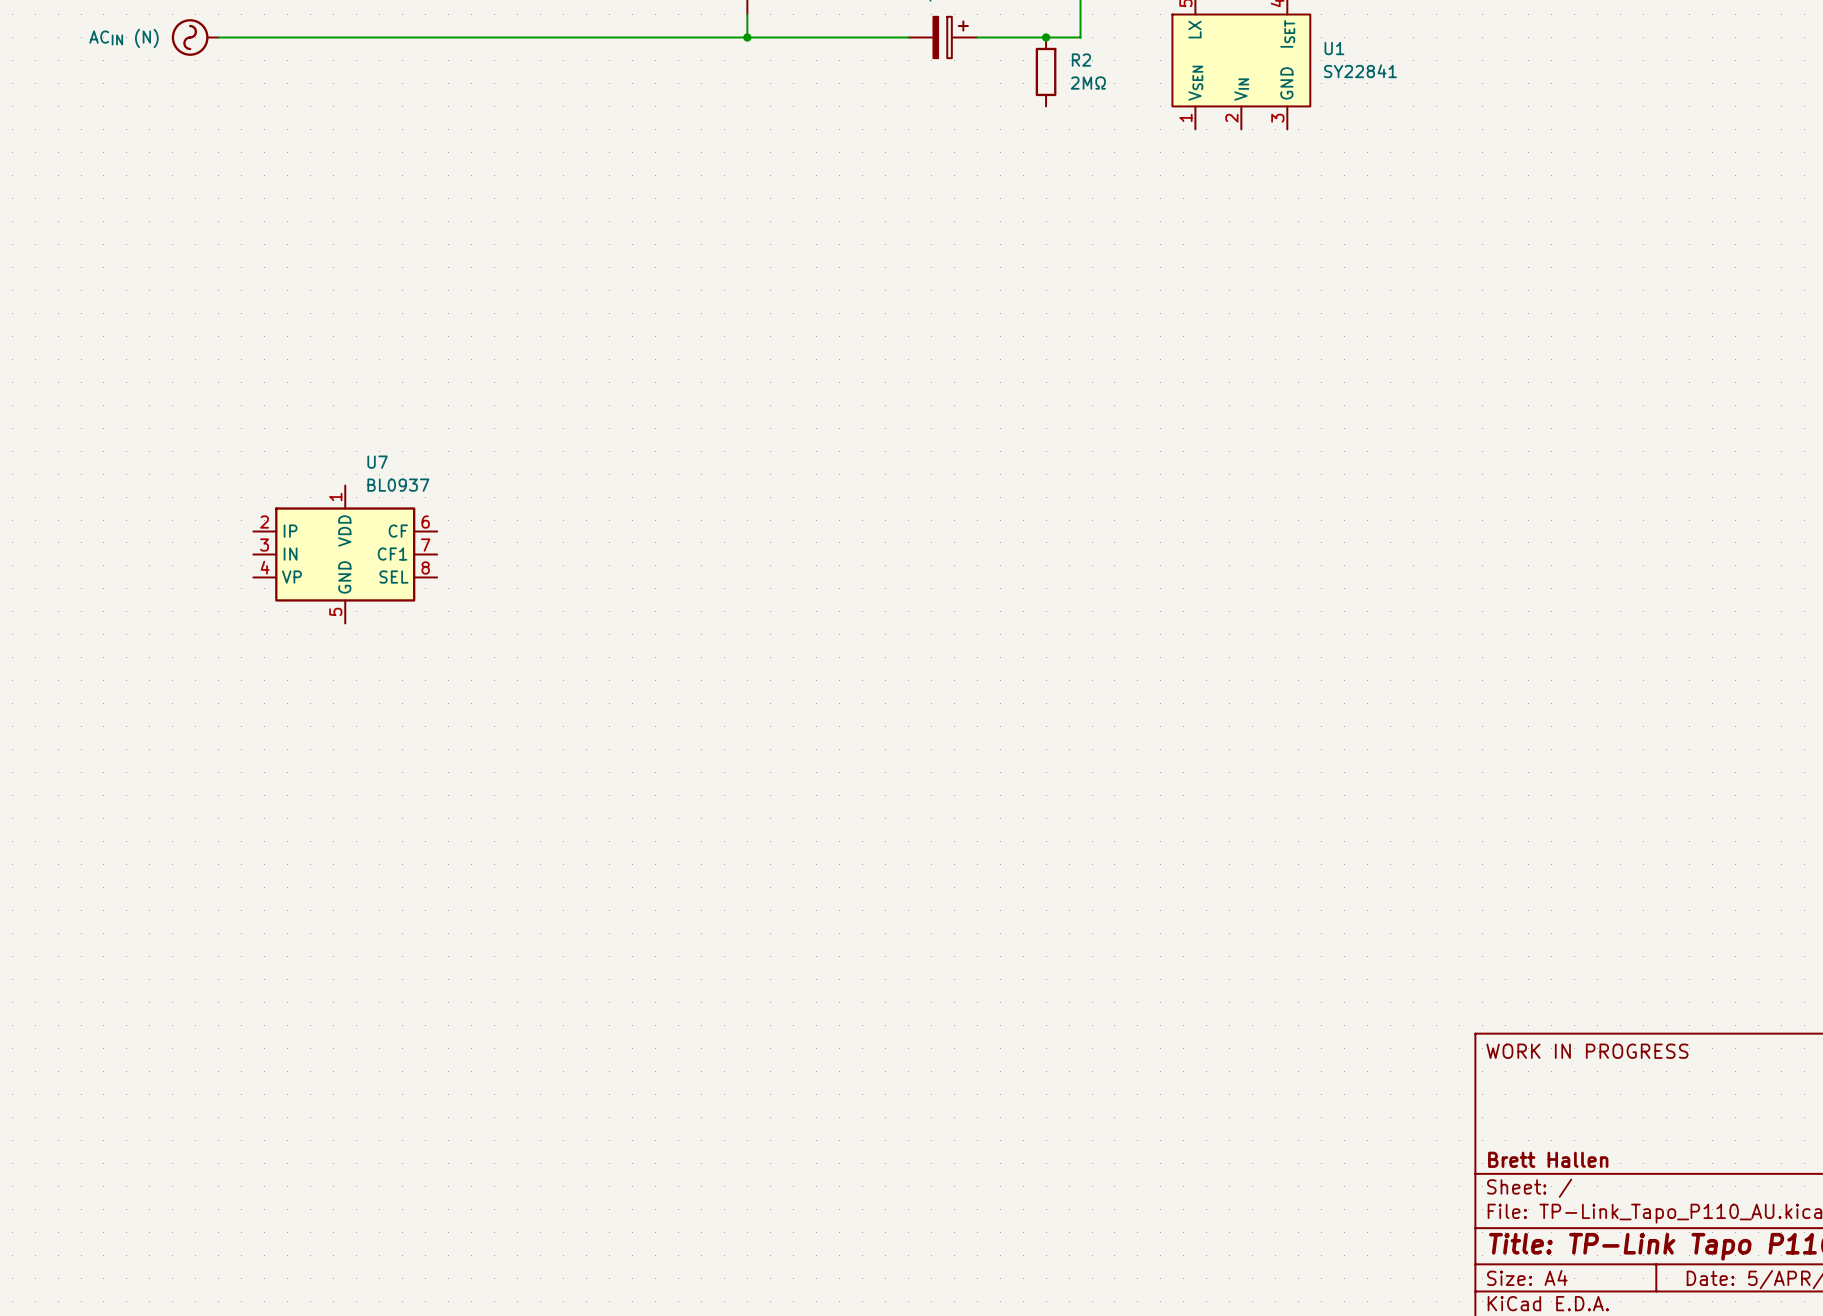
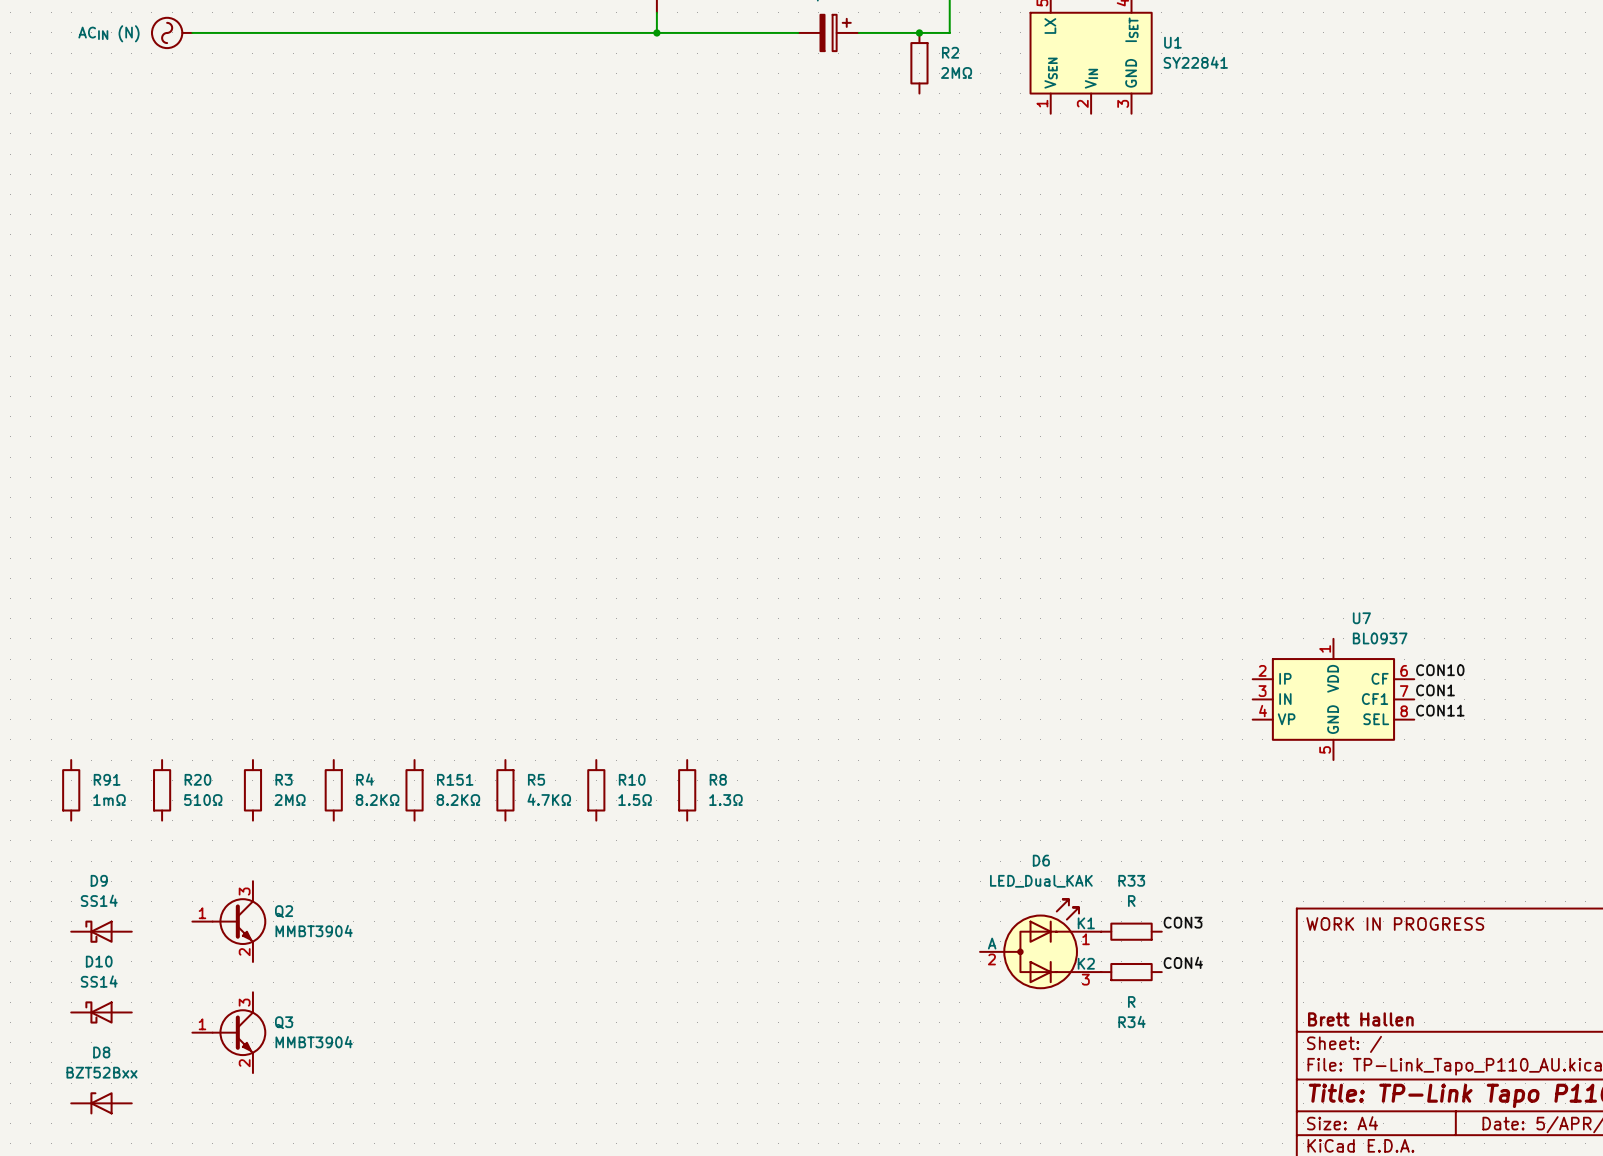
U7 position: (345, 554) -> (1333, 699)
label: none -> CON10 (1440, 670)
label: none -> CON1 (1435, 690)
label: none -> CON11 (1440, 710)
R91: none -> 1mΩ (71, 790)
R20: none -> 510Ω (162, 790)
R3: none -> 2MΩ (252, 790)
R4: none -> 8.2KΩ (333, 790)
R151: none -> 8.2KΩ (414, 790)
R5: none -> 4.7KΩ (505, 790)
R10: none -> 1.5Ω (596, 790)
R8: none -> 1.3Ω (687, 790)
Q2: none -> MMBT3904 (229, 921)
label: none -> CON3 (1183, 922)
D9: none -> SS14 (101, 931)
R33: none -> R (1131, 931)
D6: none -> LED_Dual_KAK (1040, 944)
label: none -> CON4 (1183, 962)
R34: none -> R (1131, 972)
D10: none -> SS14 (101, 1012)
Q3: none -> MMBT3904 (229, 1032)
D8: none -> BZT52Bxx (101, 1103)

